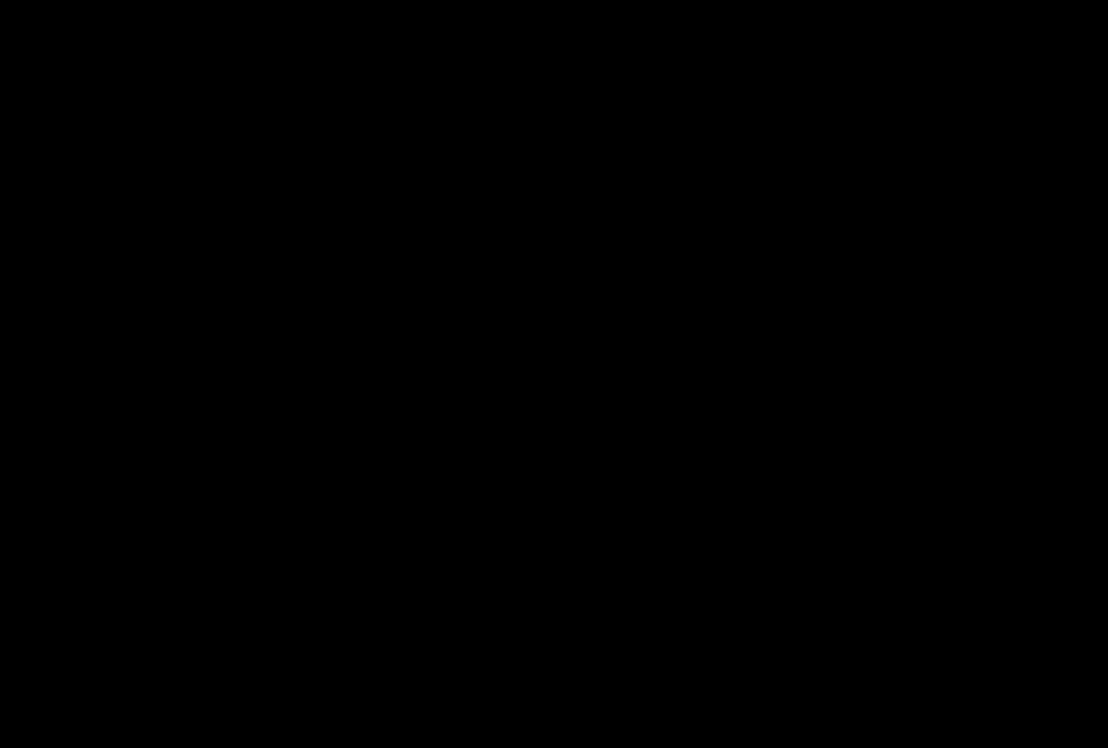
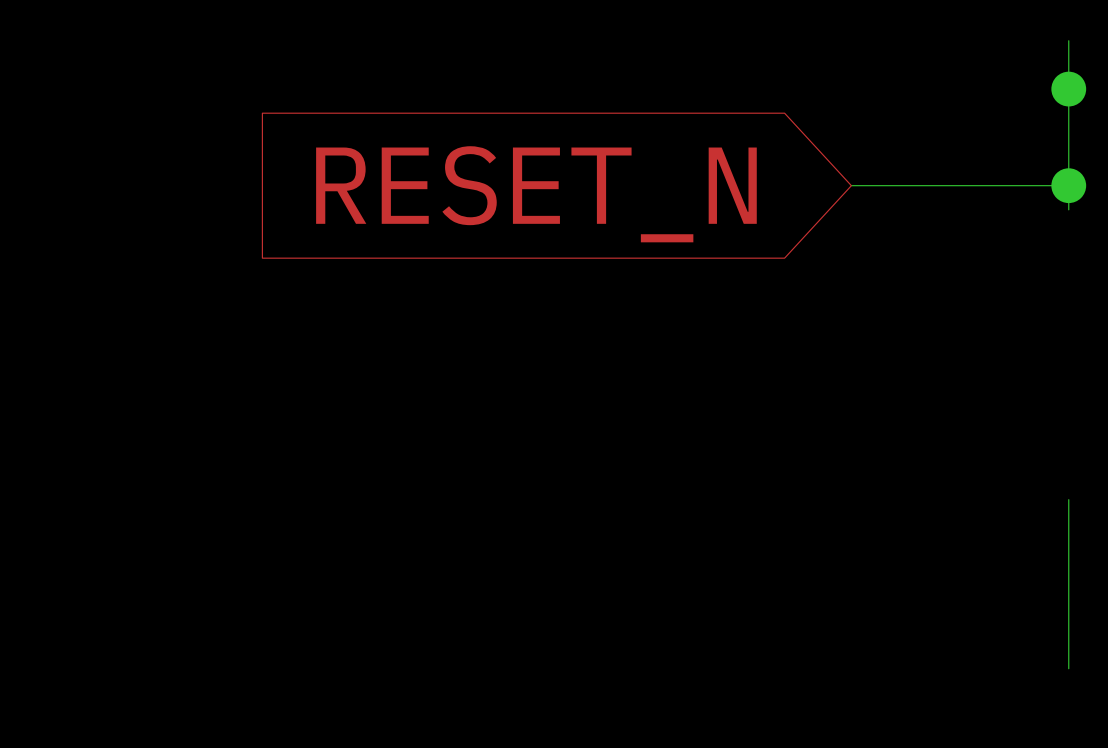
wire: none -> (1068, 40) (1068, 209)
junction: none -> (1068, 89)
wire: none -> (851, 185) (1068, 185)
junction: none -> (1068, 185)
global label: none -> RESET_N (536, 194)
wire: none -> (1068, 499) (1068, 668)

